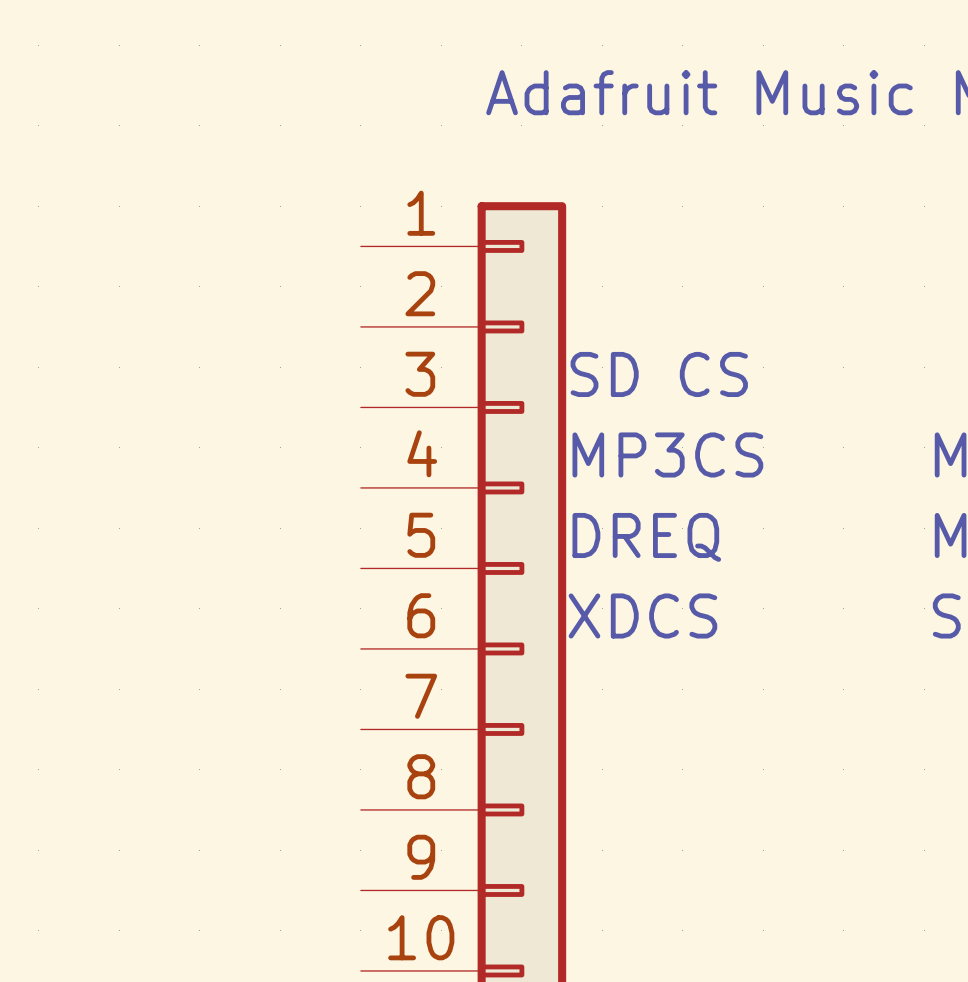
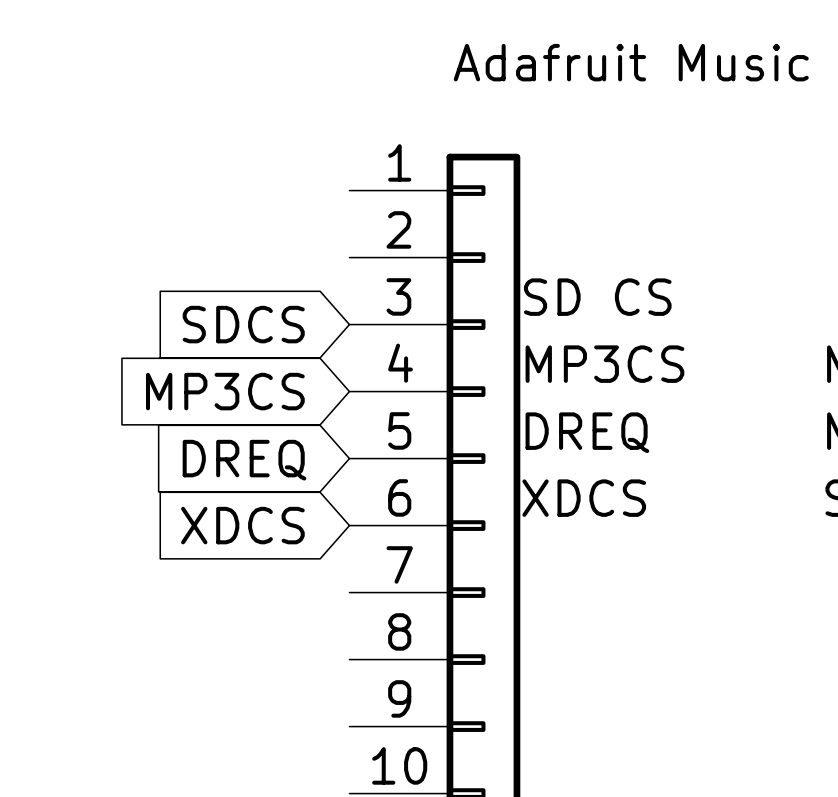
global label: none -> SDCS (243, 324)
global label: none -> MP3CS (225, 391)
global label: none -> DREQ (244, 460)
global label: none -> XDCS (242, 525)

